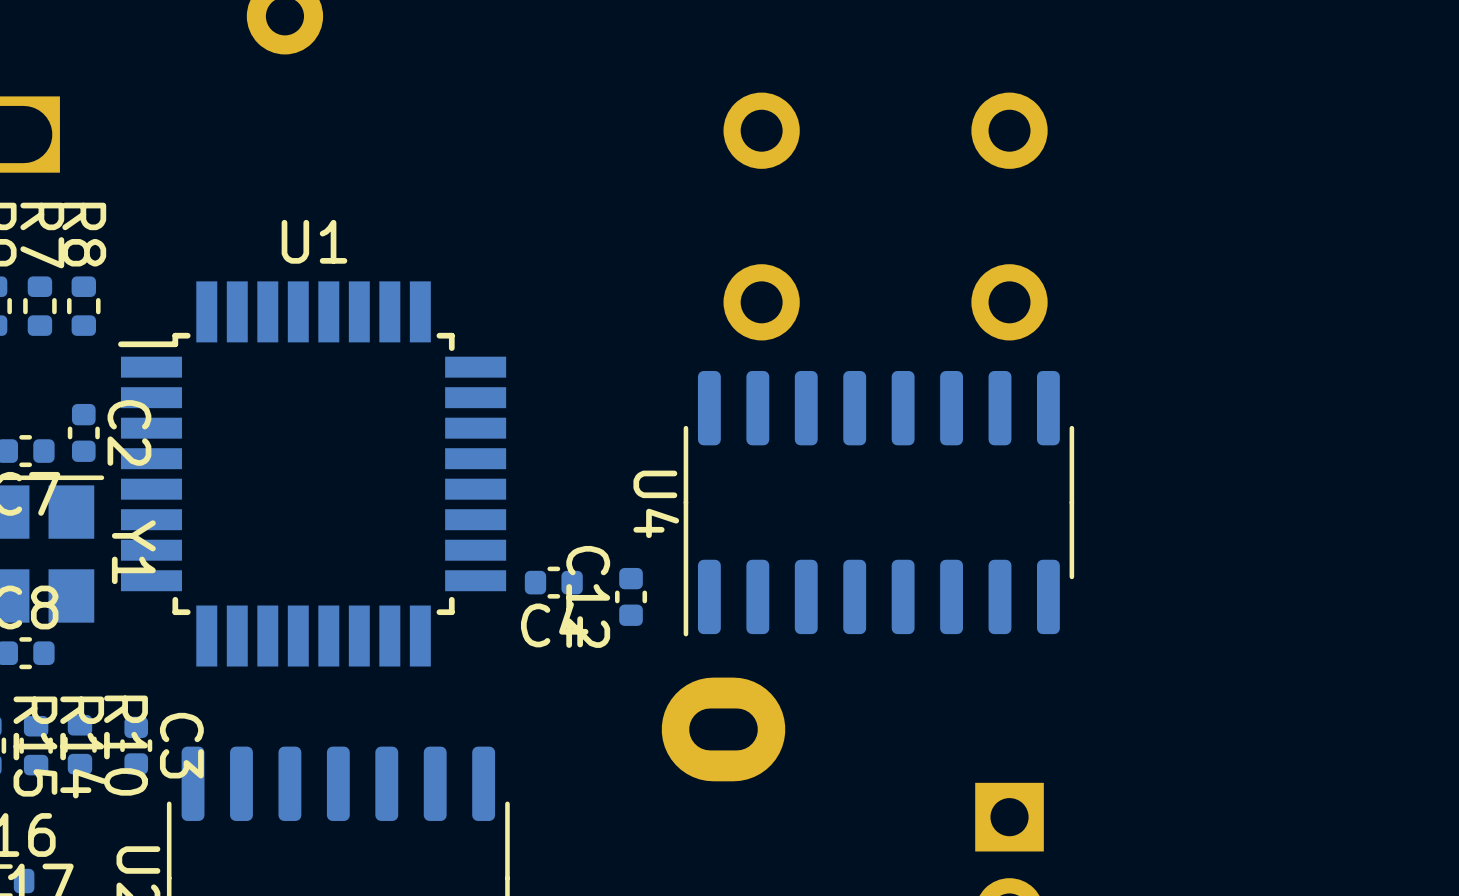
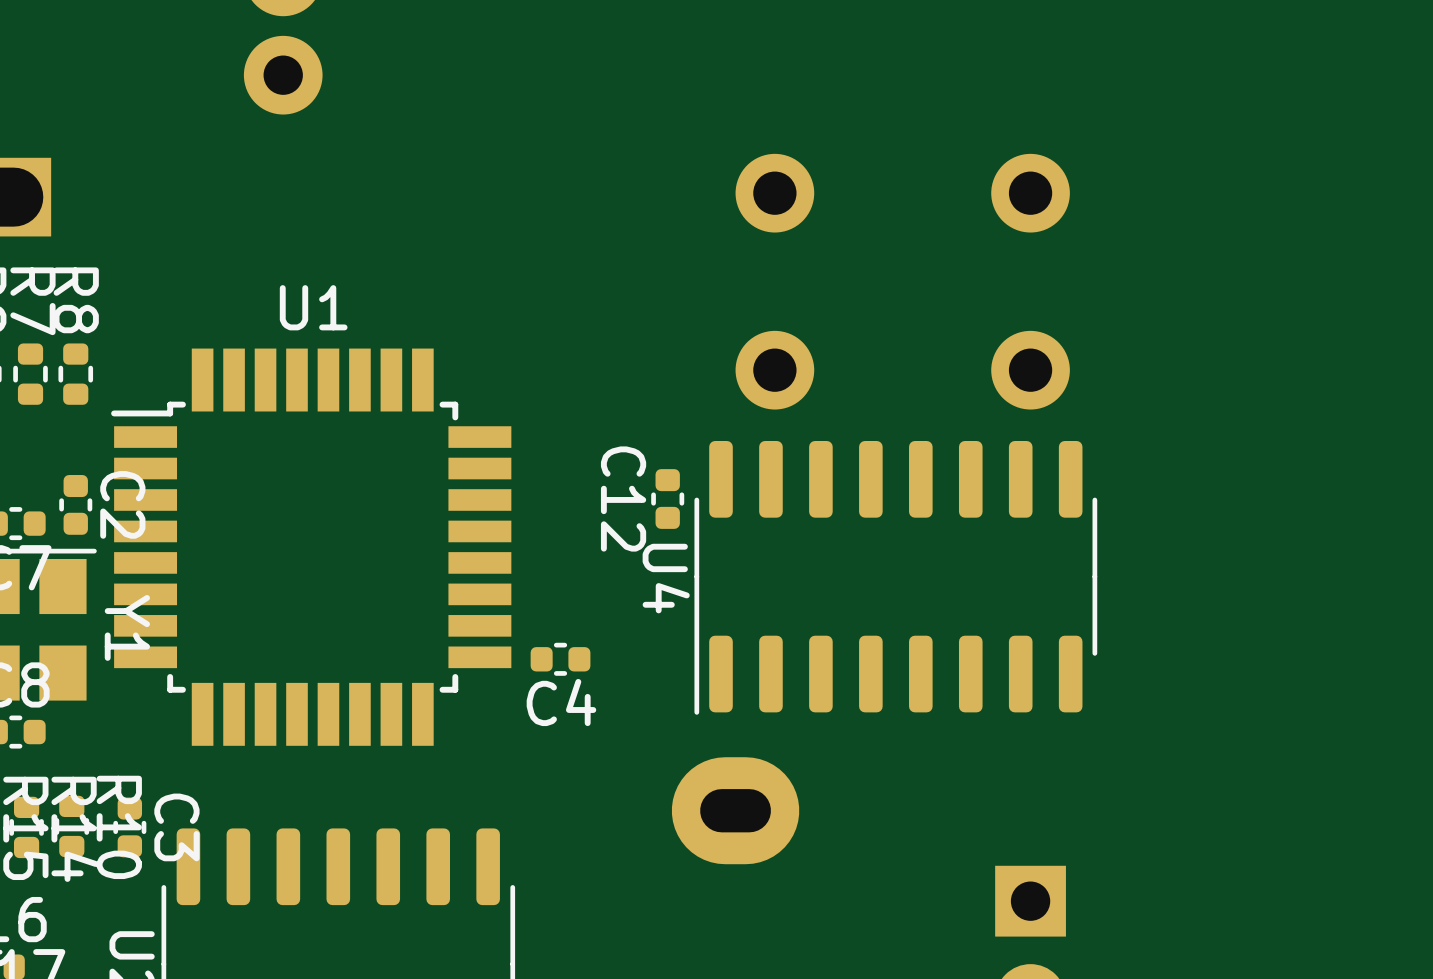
C12 position: (631, 596) -> (667, 499)

